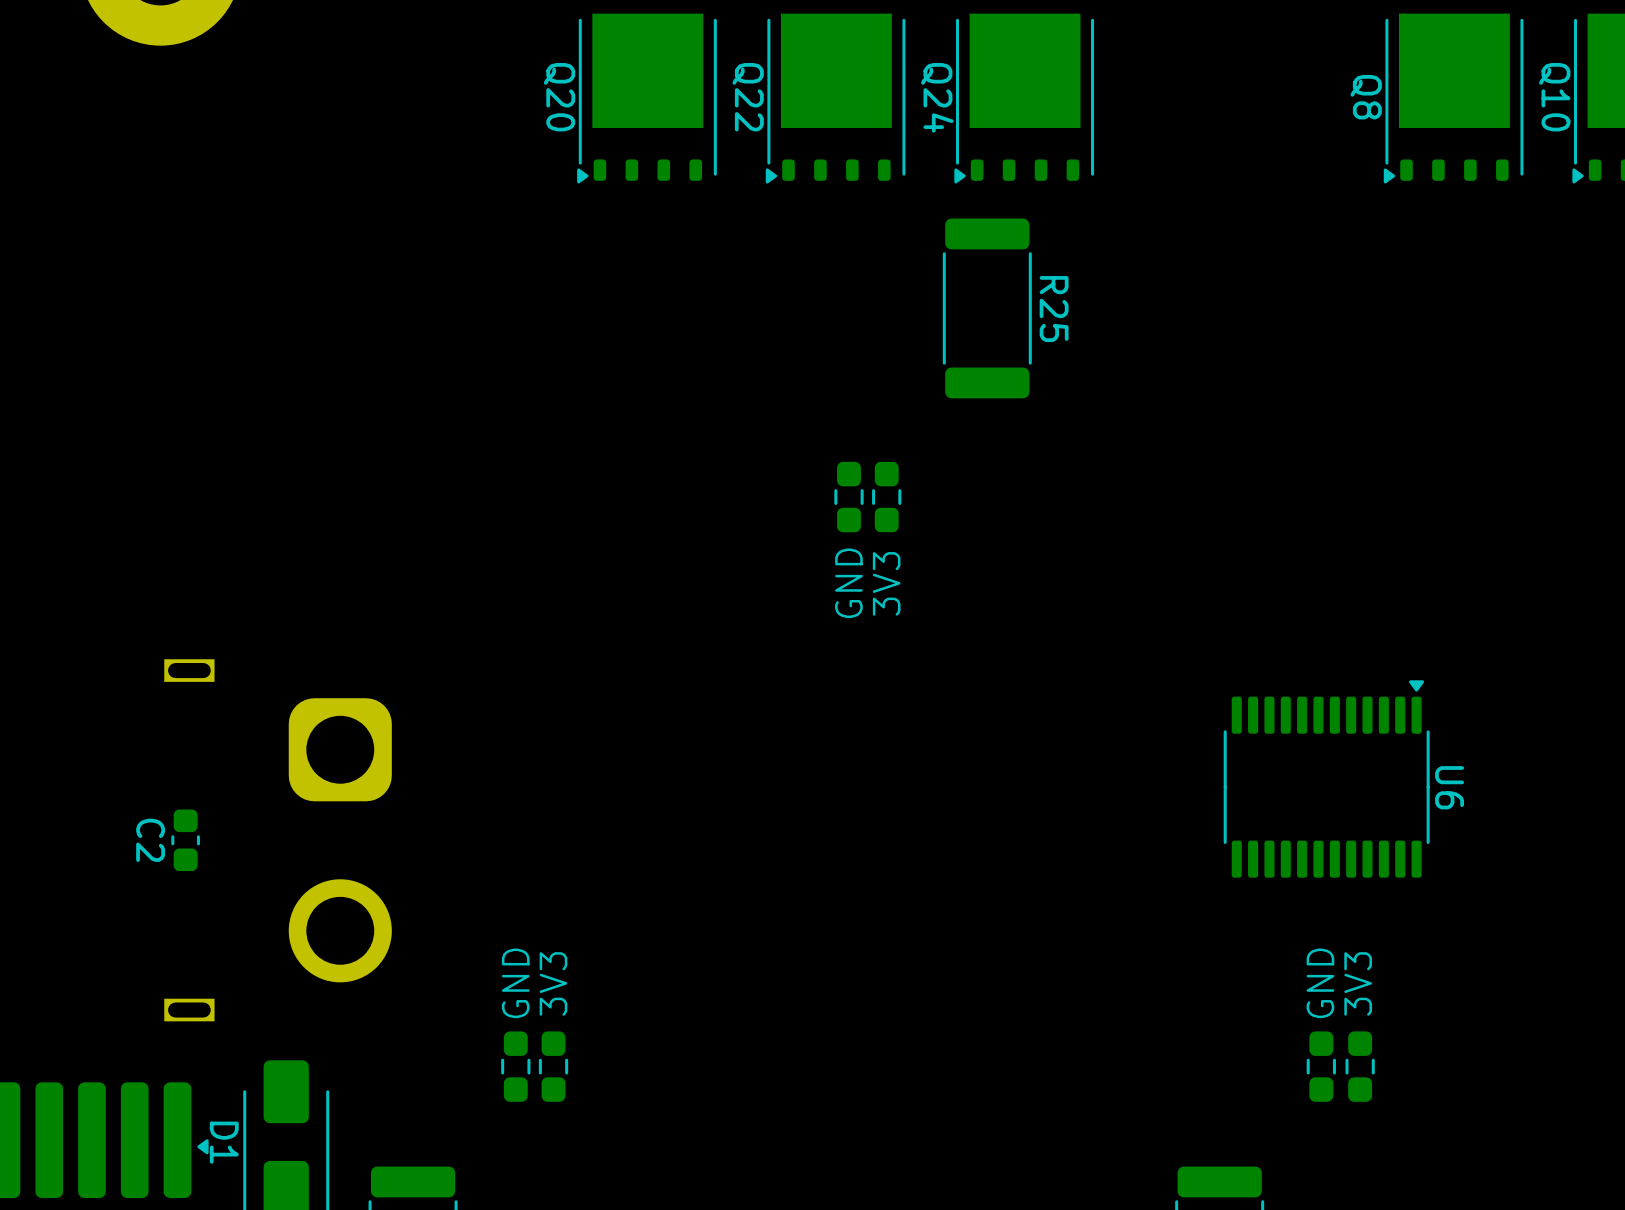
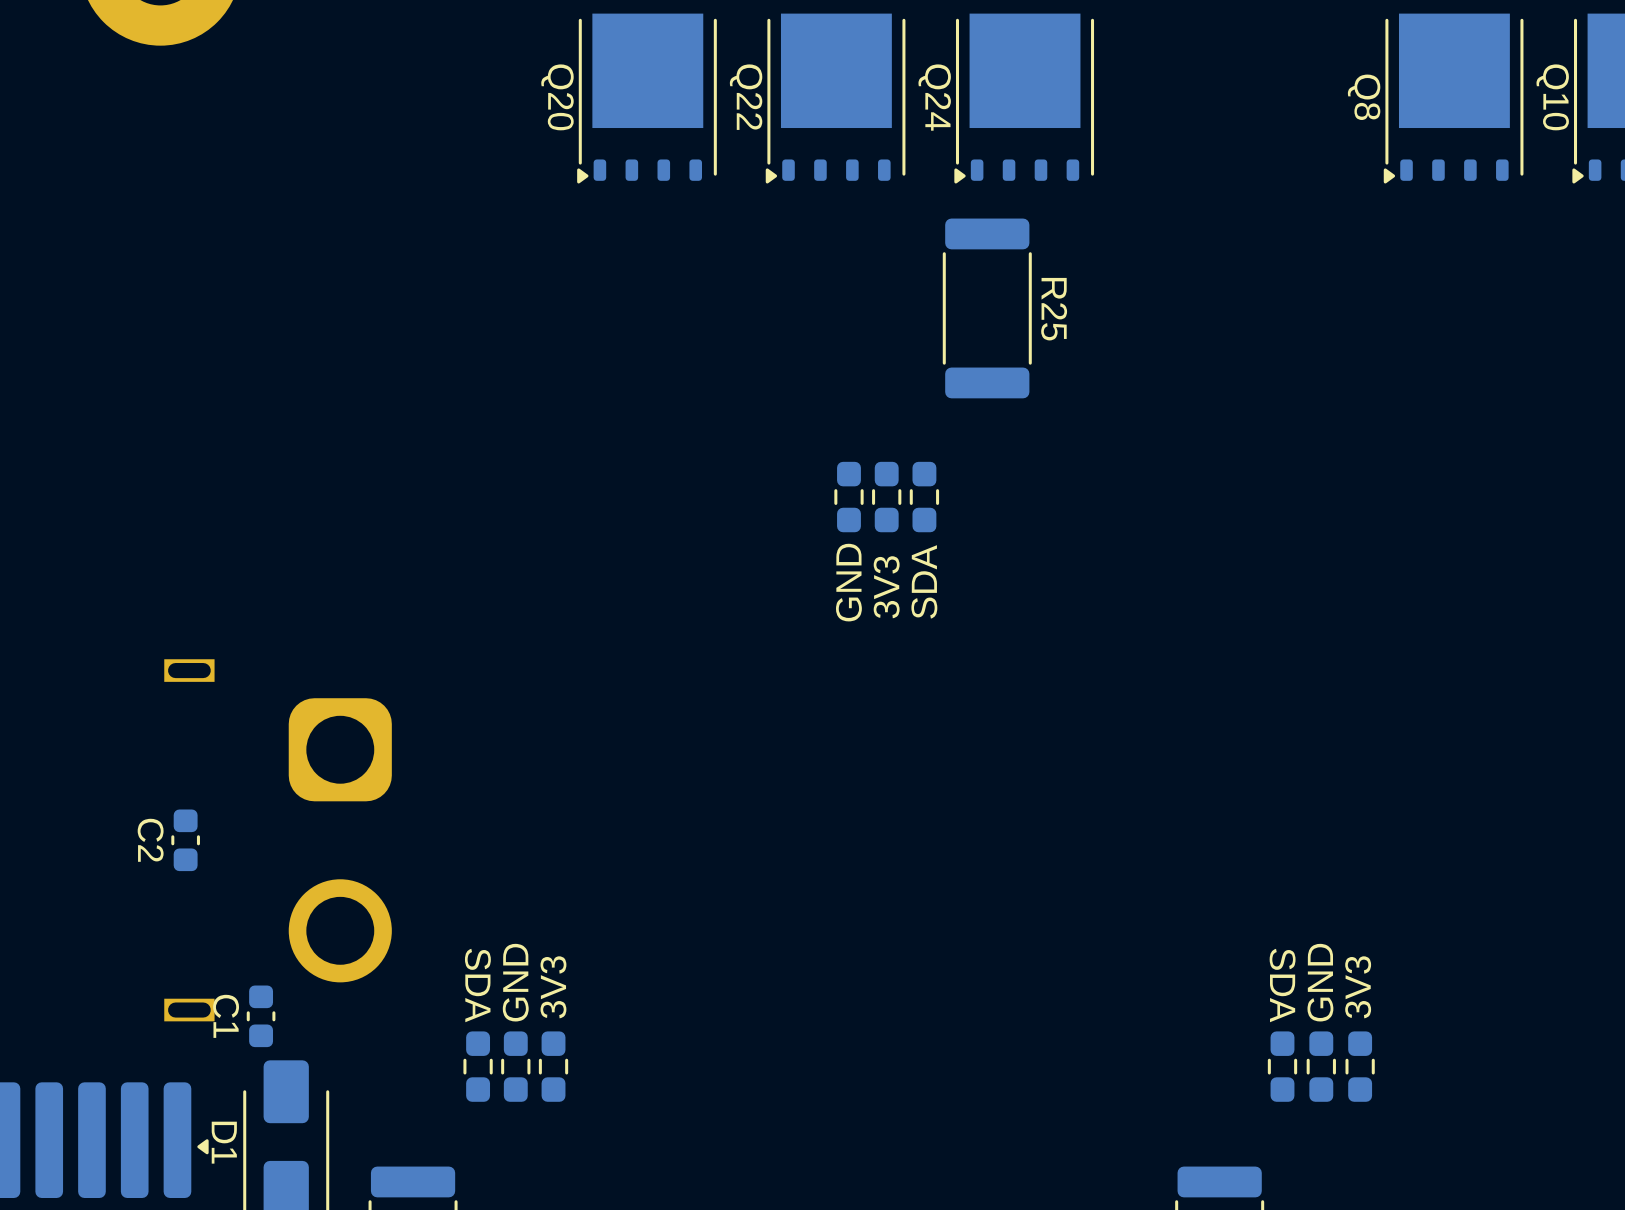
part: none -> (924, 497)
text: none -> SDA (924, 581)
U6: (1326, 778) -> none
text: none -> SDA (477, 985)
text: none -> SDA (1282, 985)
C1: none -> (261, 1016)
part: none -> (478, 1066)
part: none -> (1282, 1066)

